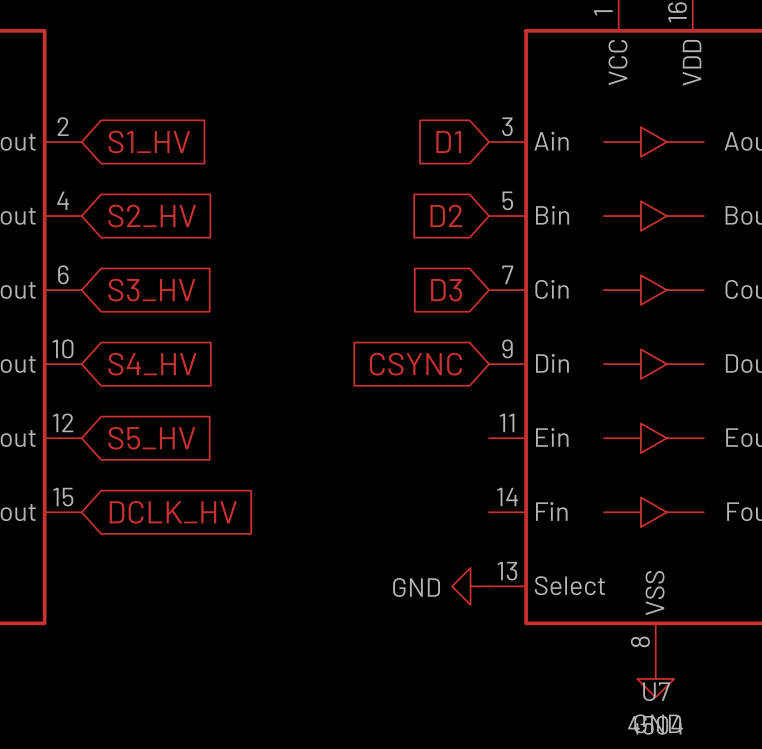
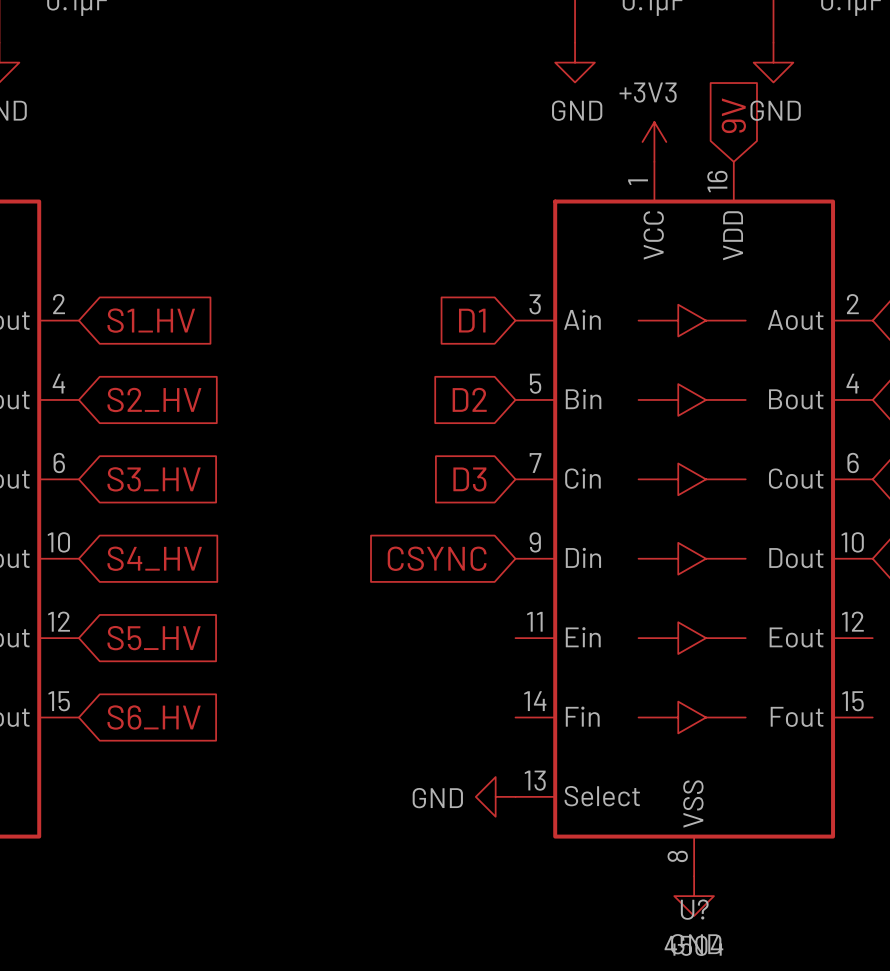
global label: DCLK_HV (173, 512) -> S6_HV (154, 717)
U7 name: U7 (656, 691) -> U? (694, 909)

